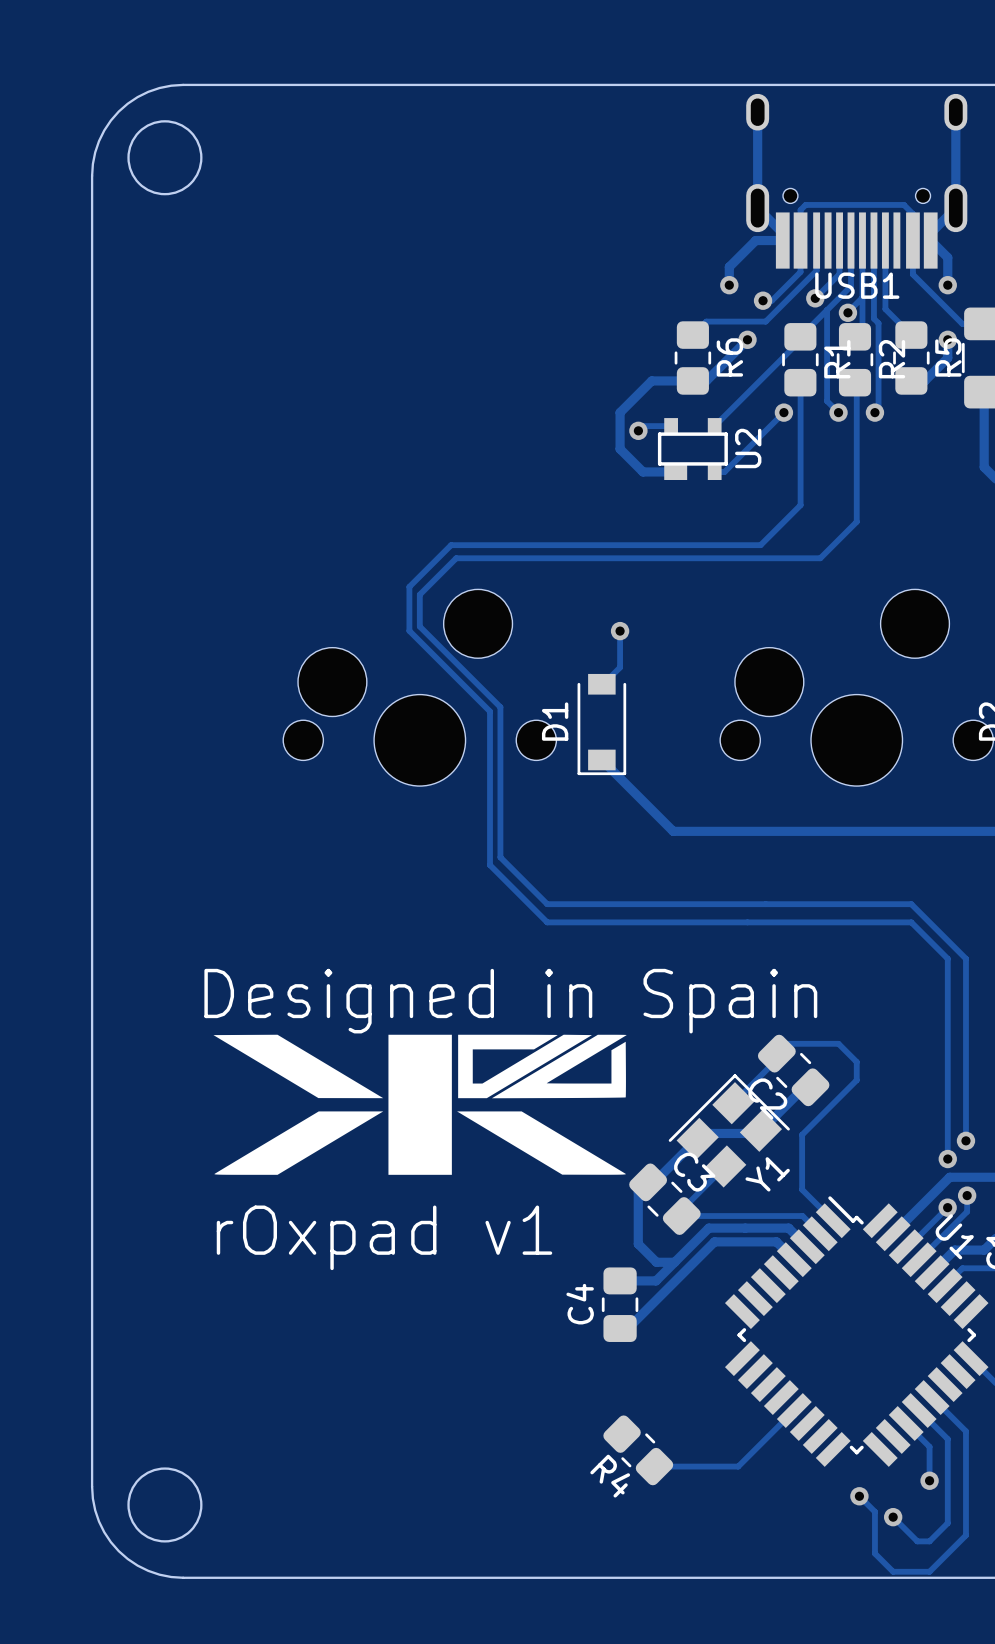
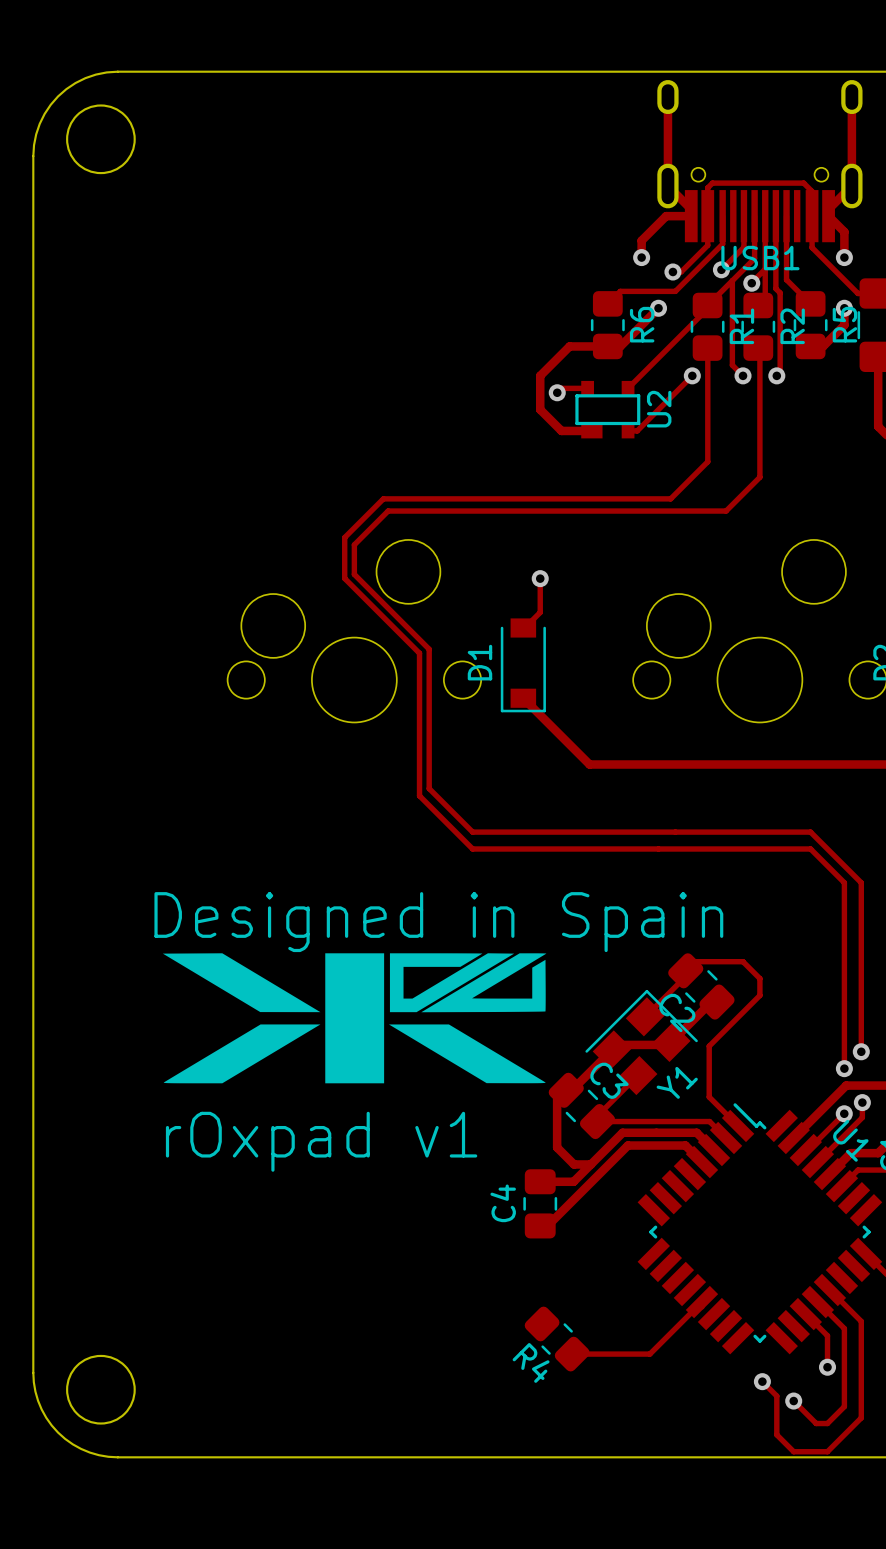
board edge: (183, 84) (159, 88) (148, 91) (137, 97) (118, 111) (104, 130) (99, 141) (92, 164) (92, 175) (92, 1486) (95, 1510) (99, 1521) (110, 1542) (118, 1551) (127, 1558) (148, 1570) (171, 1577) (183, 1577) -> (134, 71) (95, 74) (66, 89) (50, 104) (39, 123) (33, 156) (33, 1382) (41, 1409) (51, 1425) (65, 1438) (81, 1448) (99, 1455) (134, 1457)
round board edge position: (164, 157) -> (100, 139)
round board edge position: (164, 1504) -> (100, 1389)

